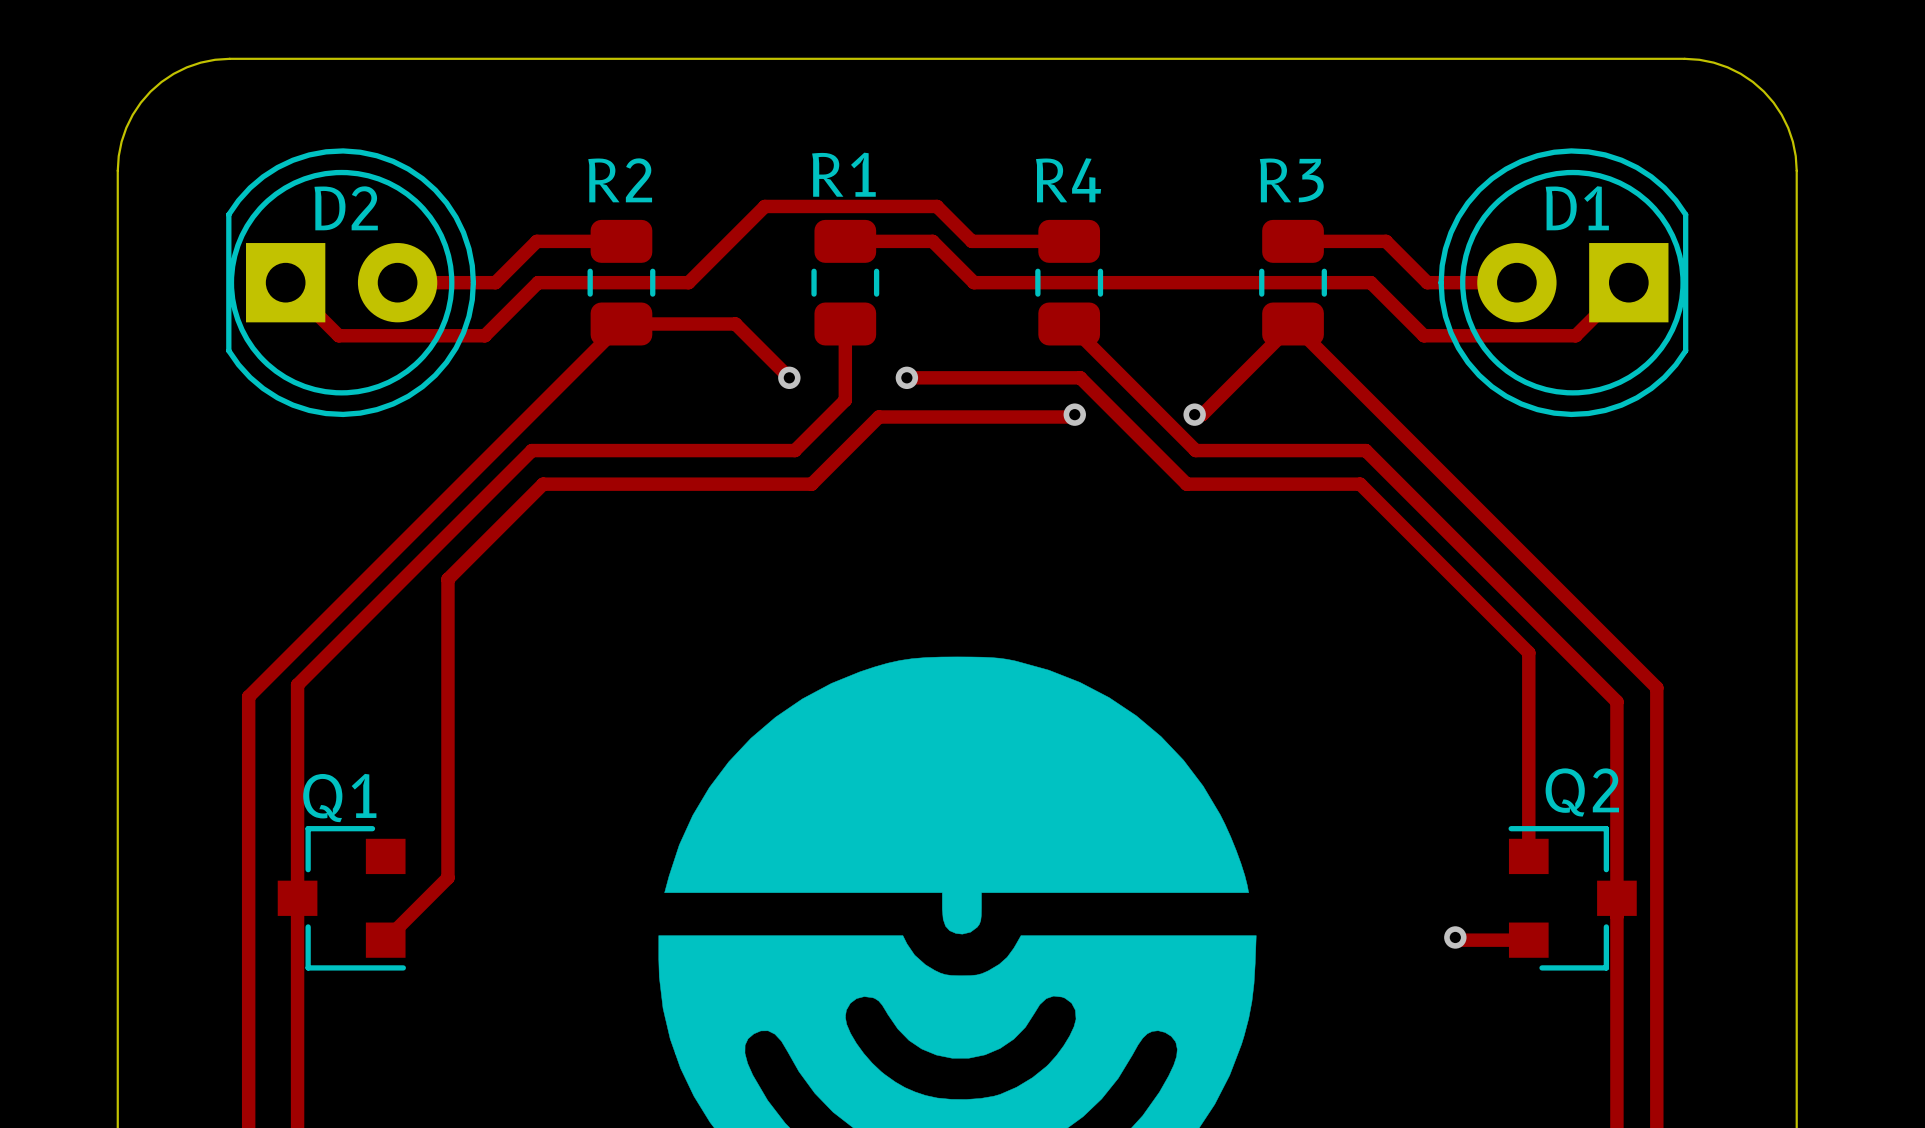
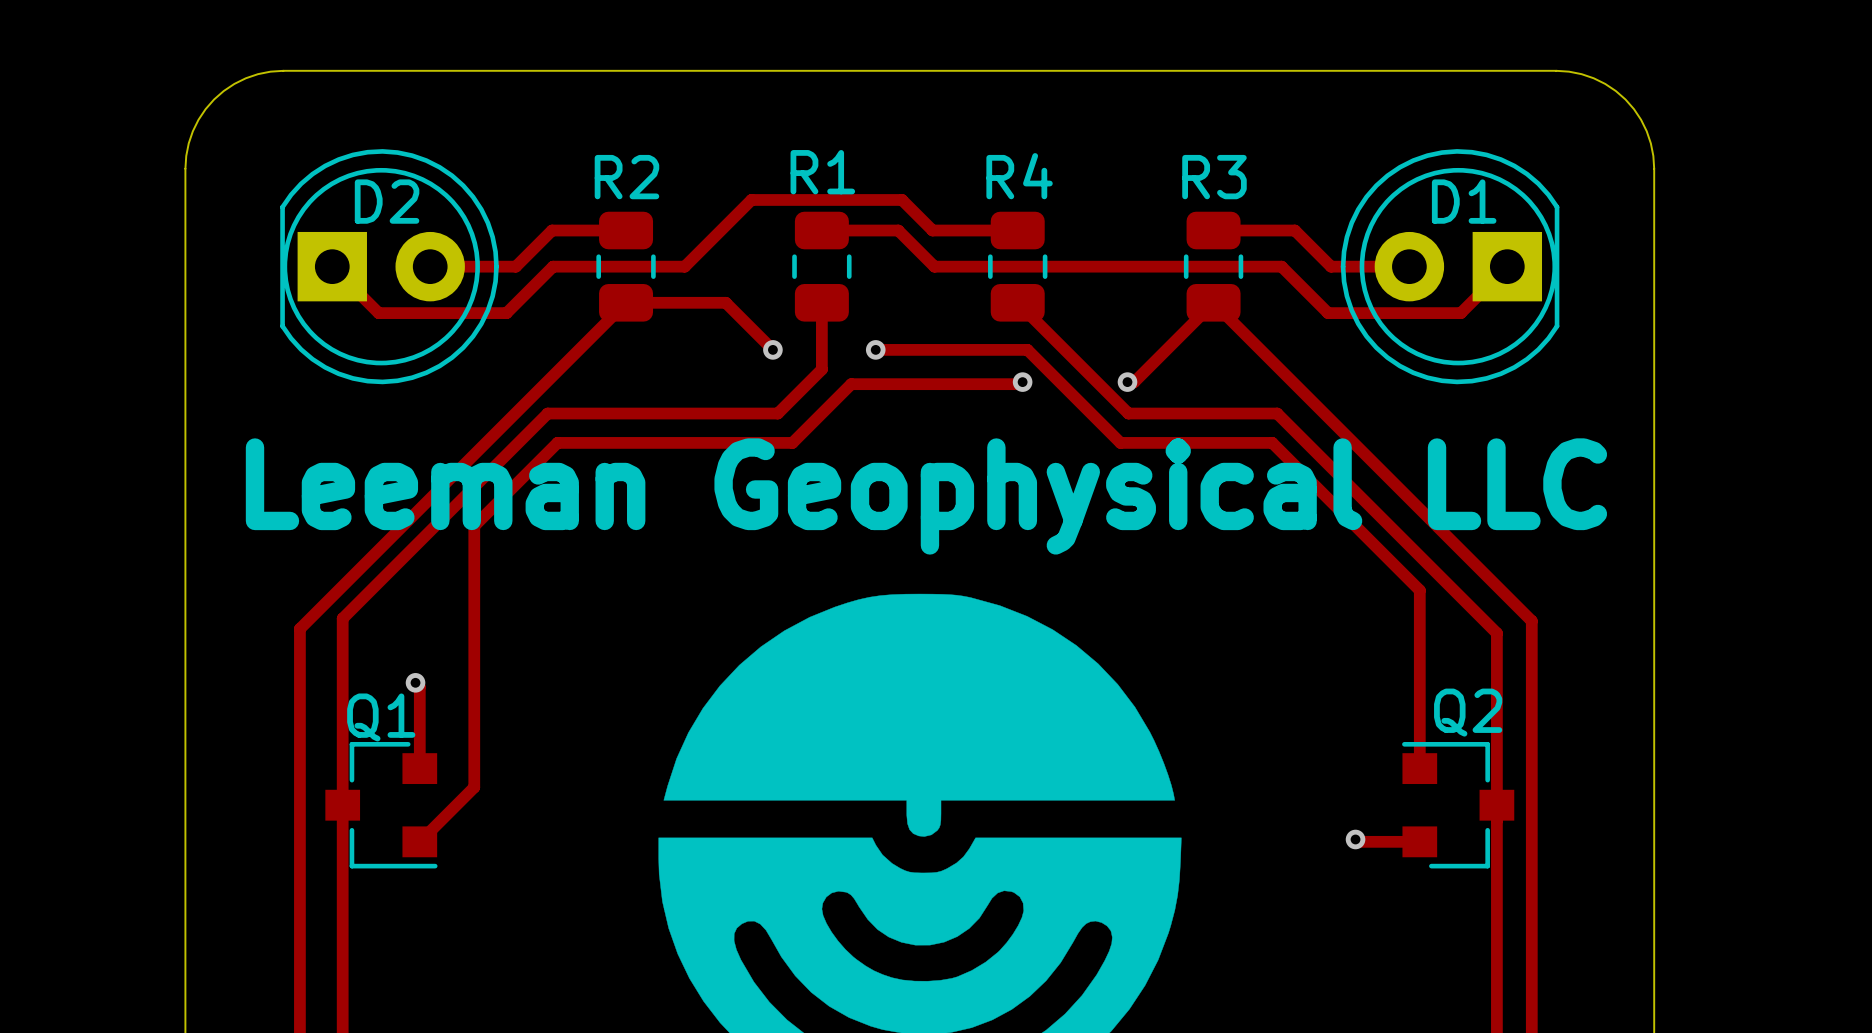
text: none -> Leeman Geophysical LLC (926, 496)
track: none -> (415, 682) (419, 687) (419, 768)
via: none -> (415, 682)

